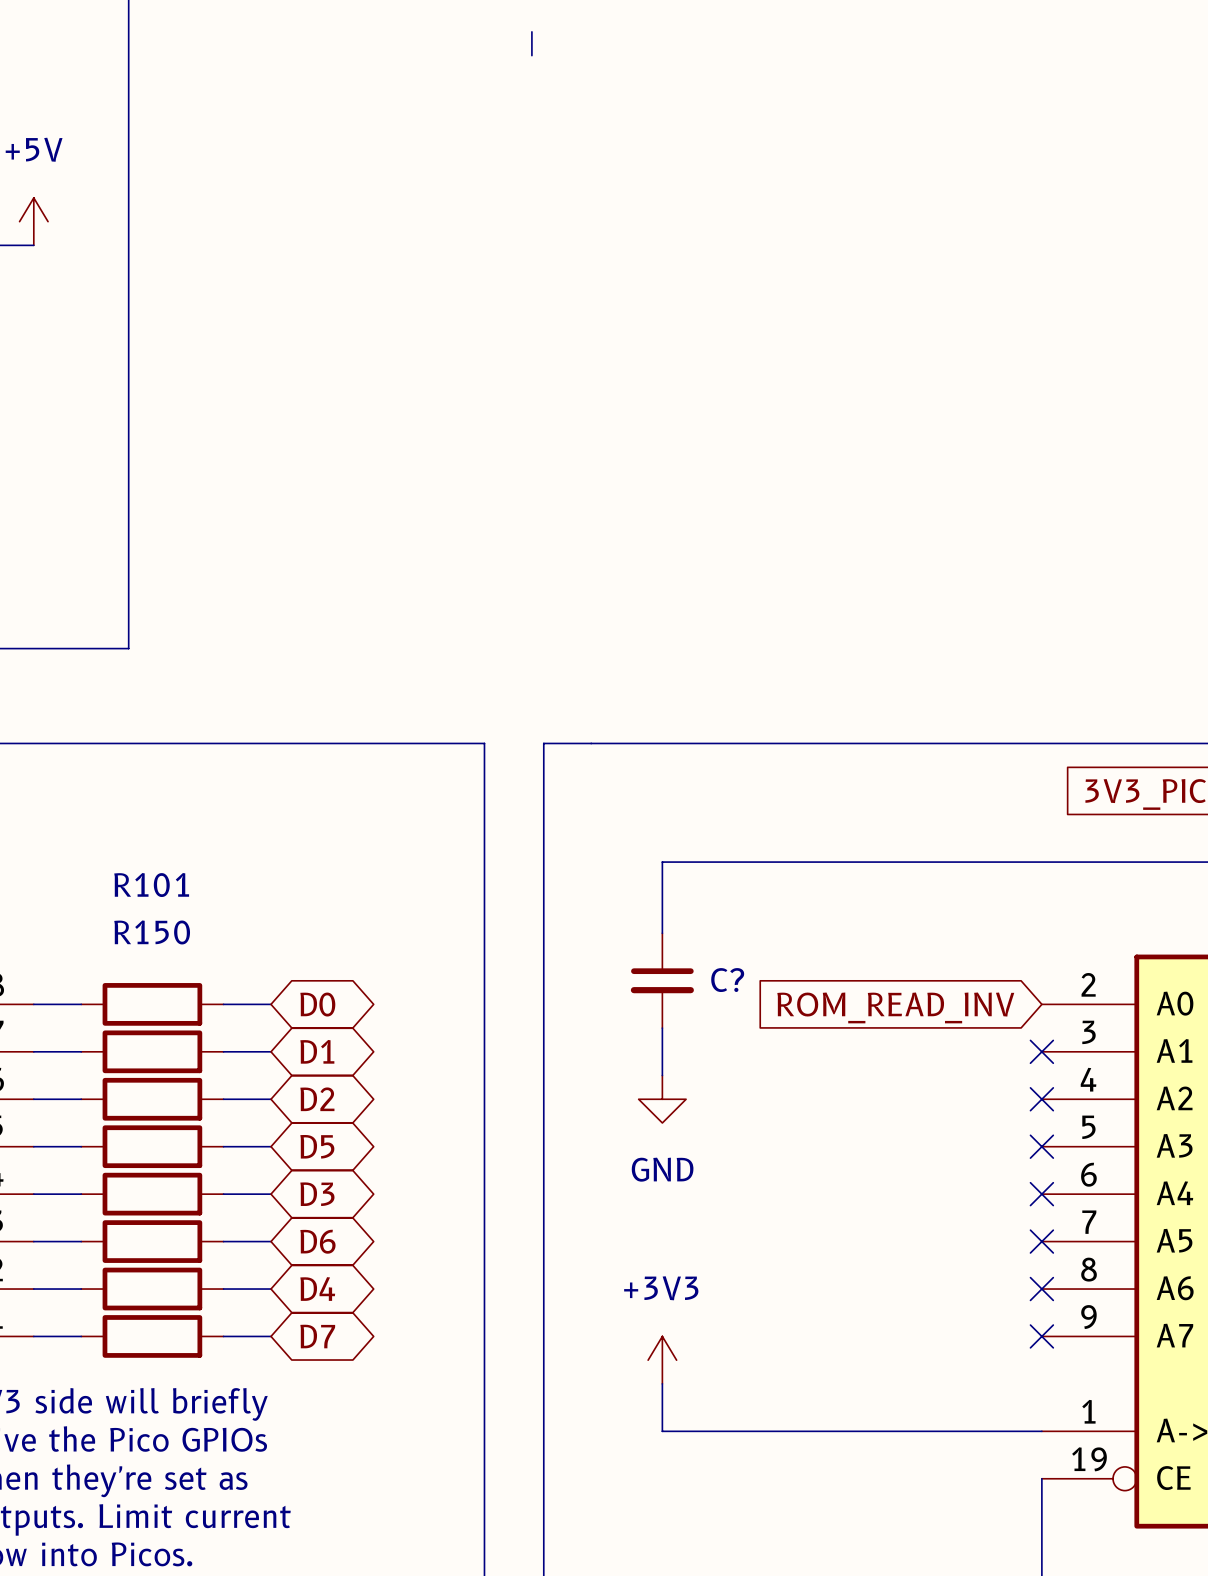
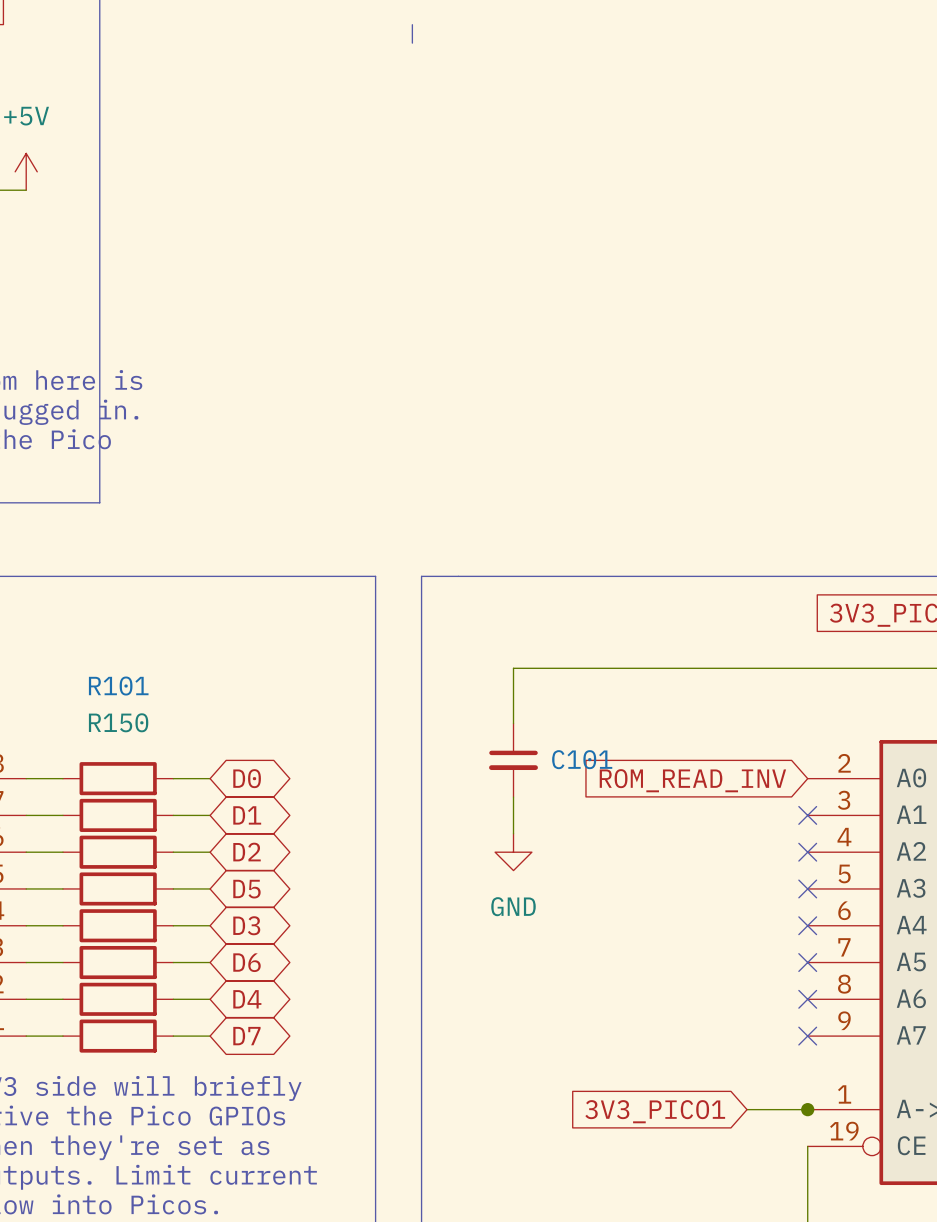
C? name: C? (727, 980) -> C101 (582, 759)
power symbol: +3V3 (662, 1360) -> none
wire: (662, 1383) (662, 1431) (963, 1431) -> none
junction: none -> (807, 1109)
global label: none -> 3V3_PICO1 (655, 1111)

